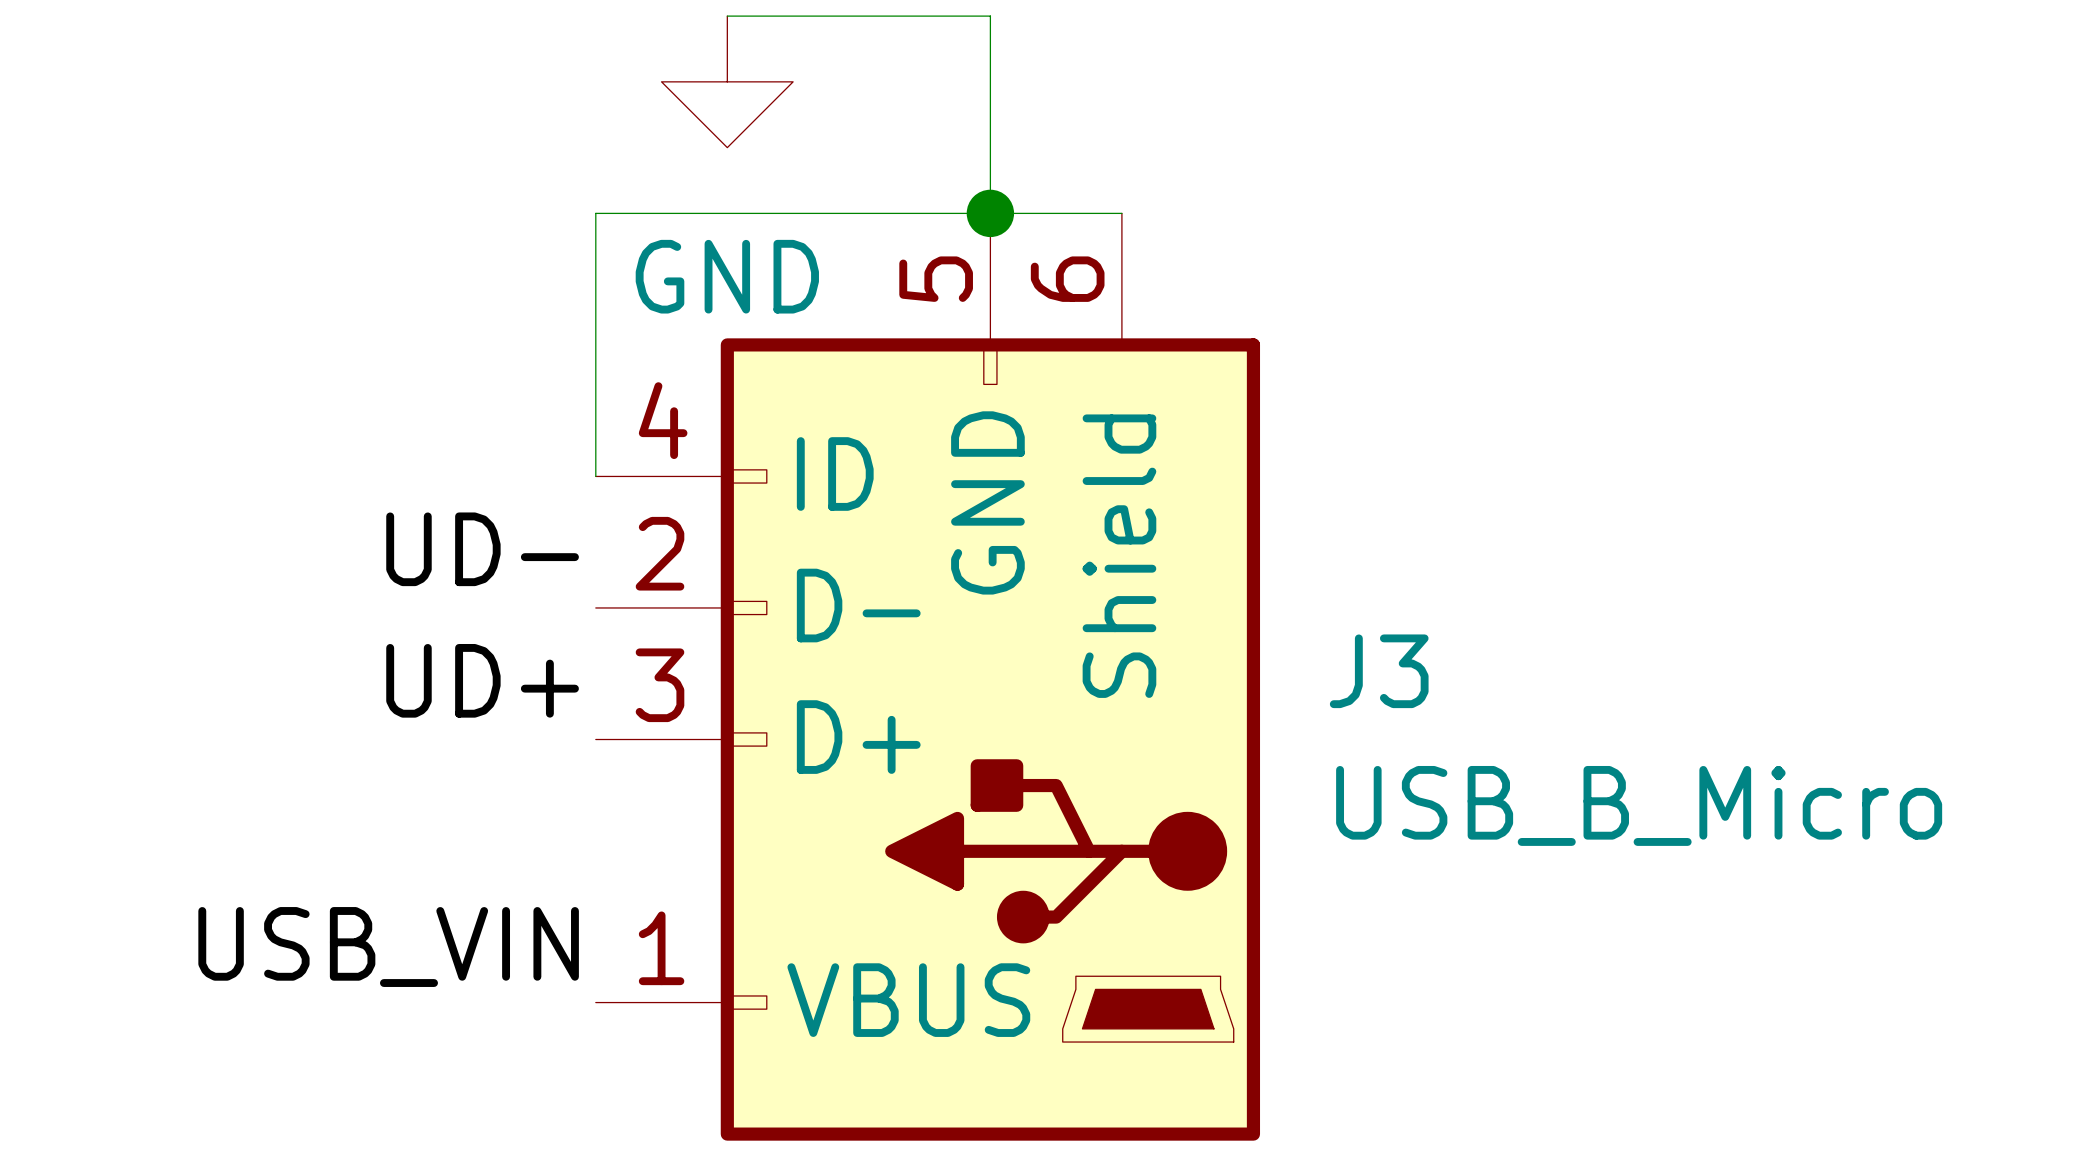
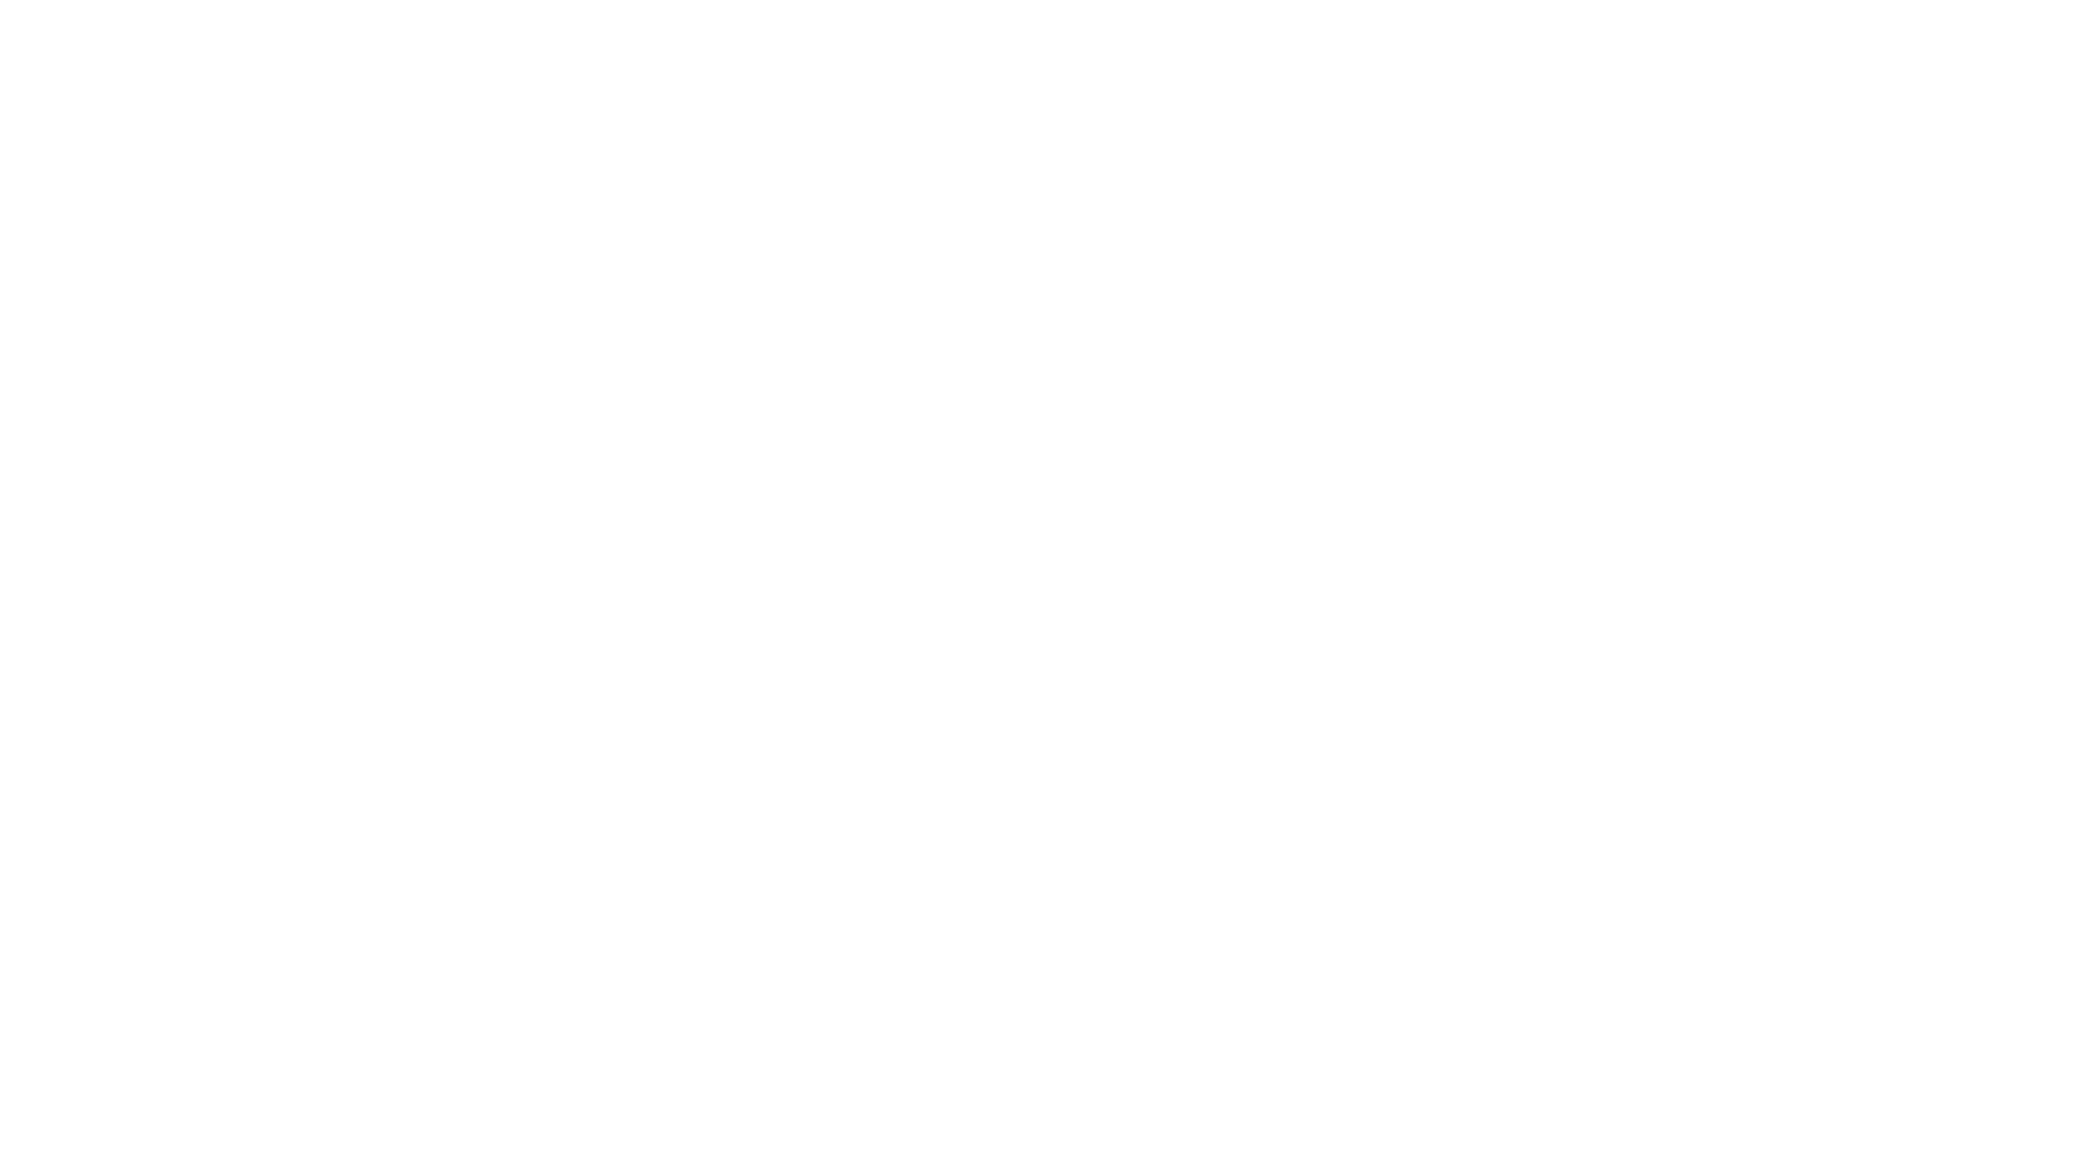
wire: (727, 16) (990, 16) (990, 213) -> none
power symbol: GND (727, 81) -> none
junction: (990, 213) -> none
wire: (1121, 213) (595, 213) (595, 476) -> none
label: UD- (482, 549) -> none
J3: USB_B_Micro (927, 677) -> none
label: UD+ (482, 680) -> none
label: USB_VIN (388, 947) -> none

